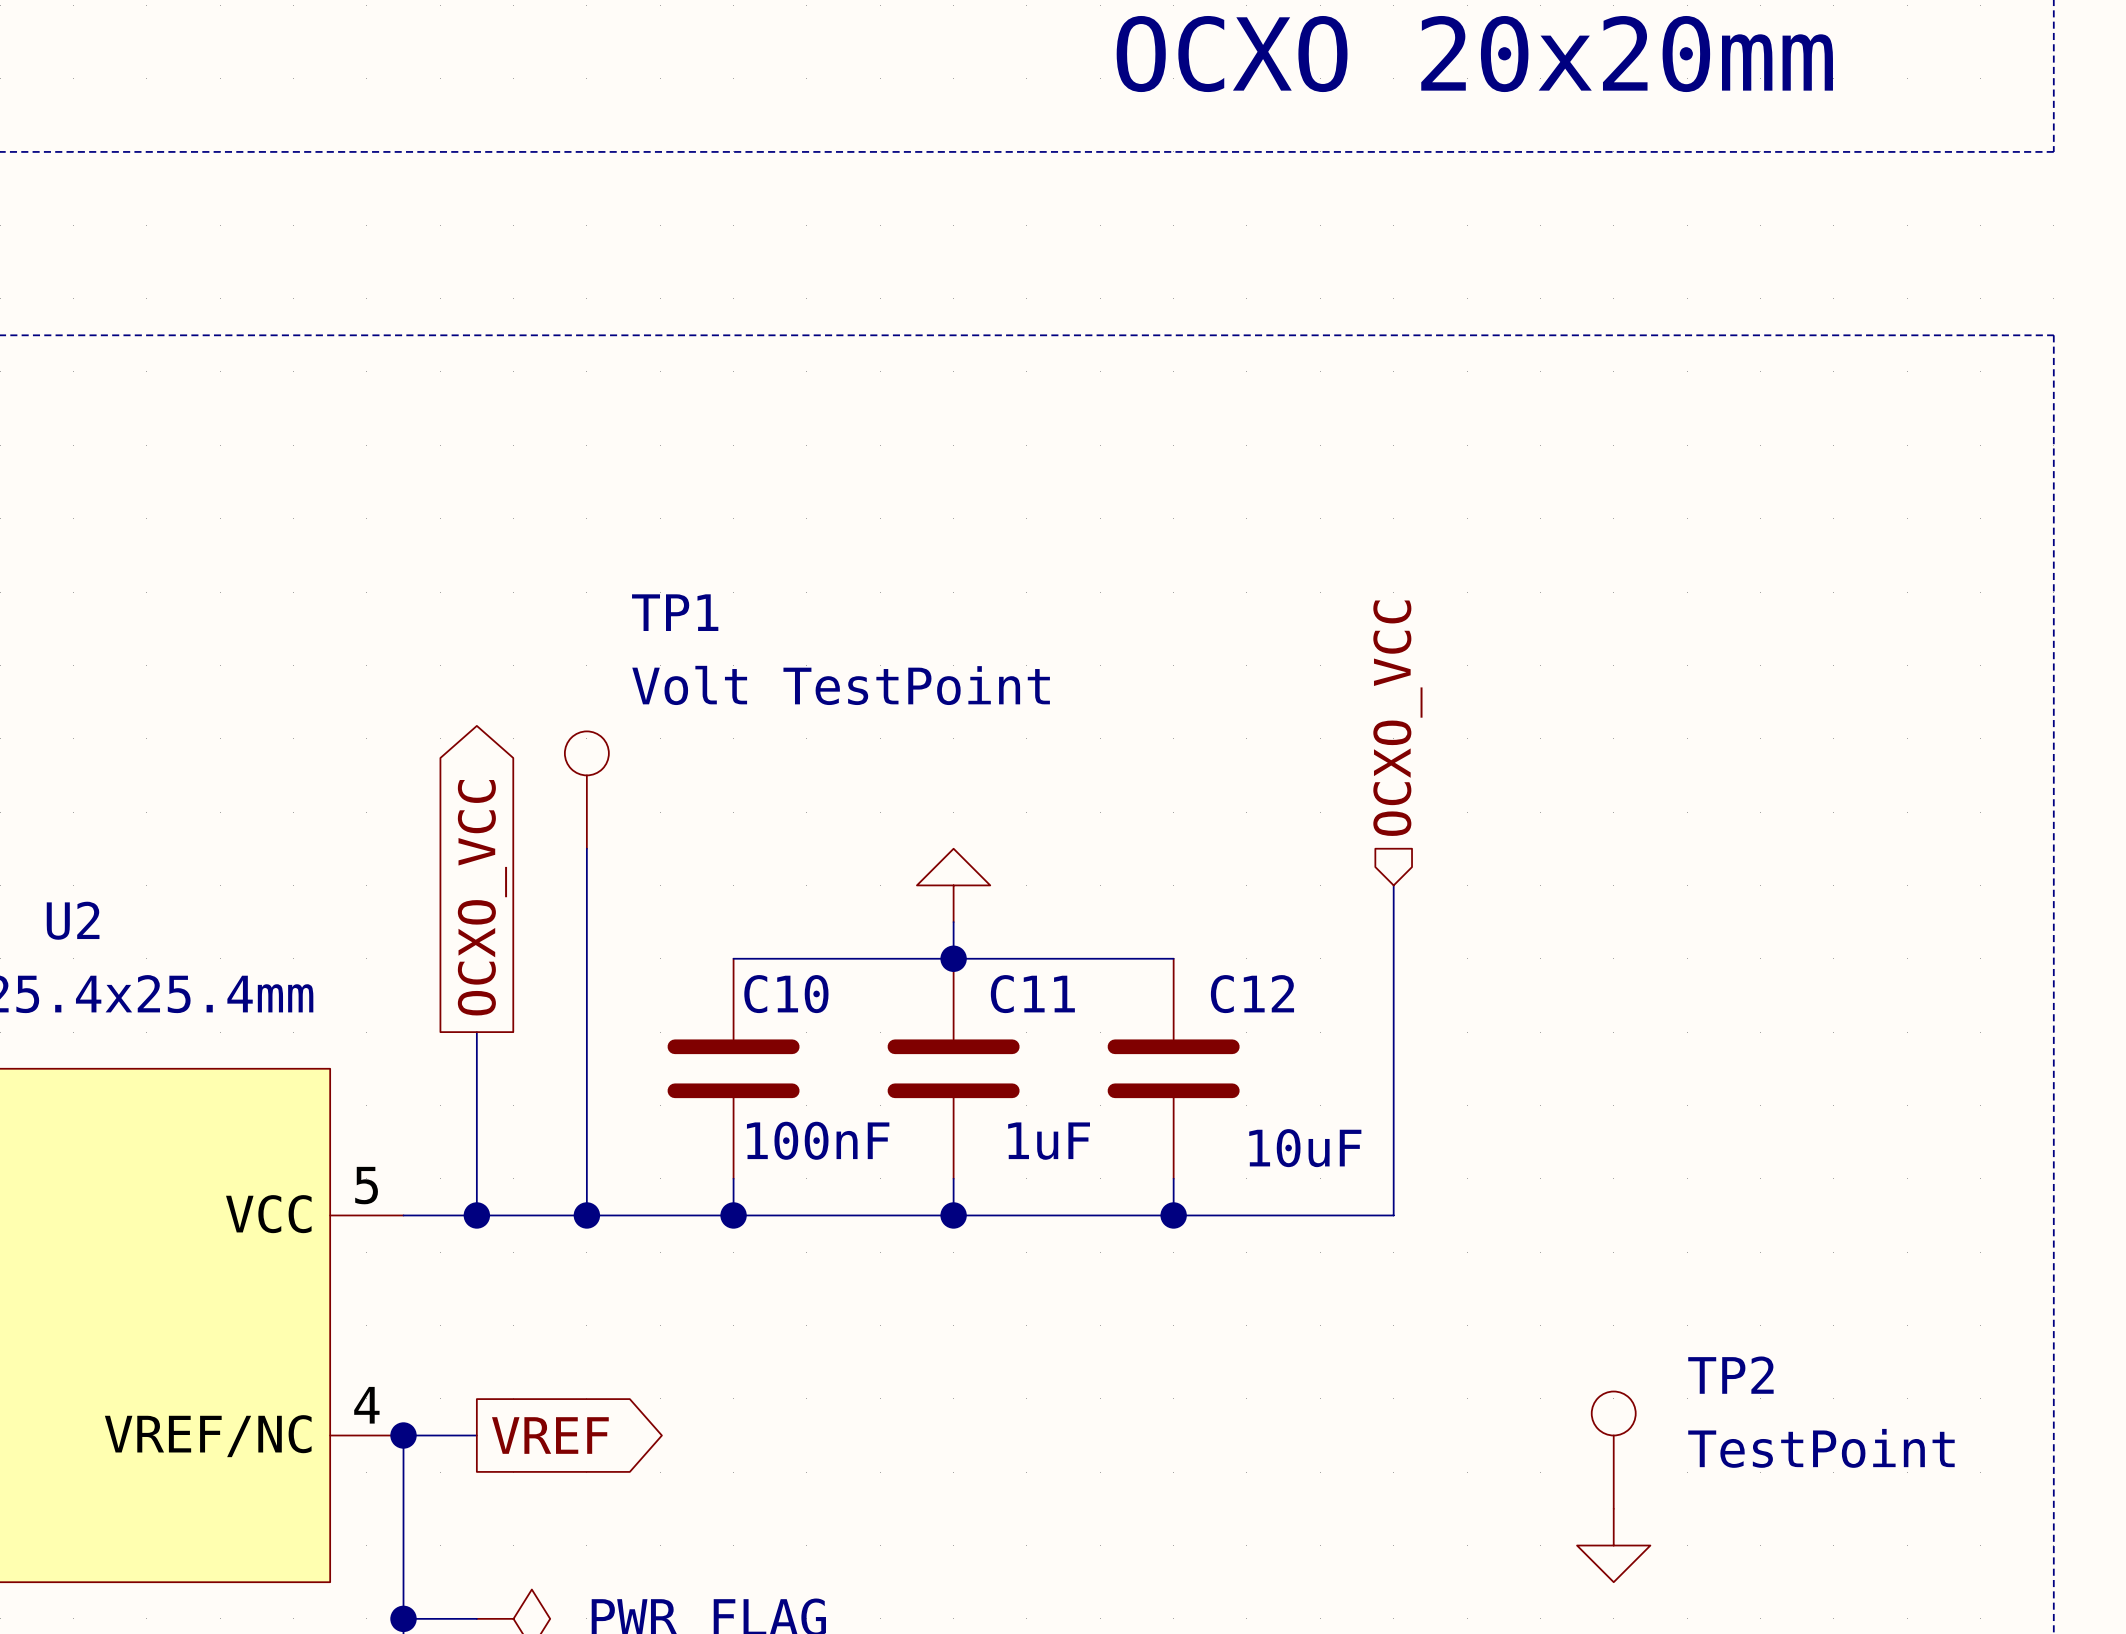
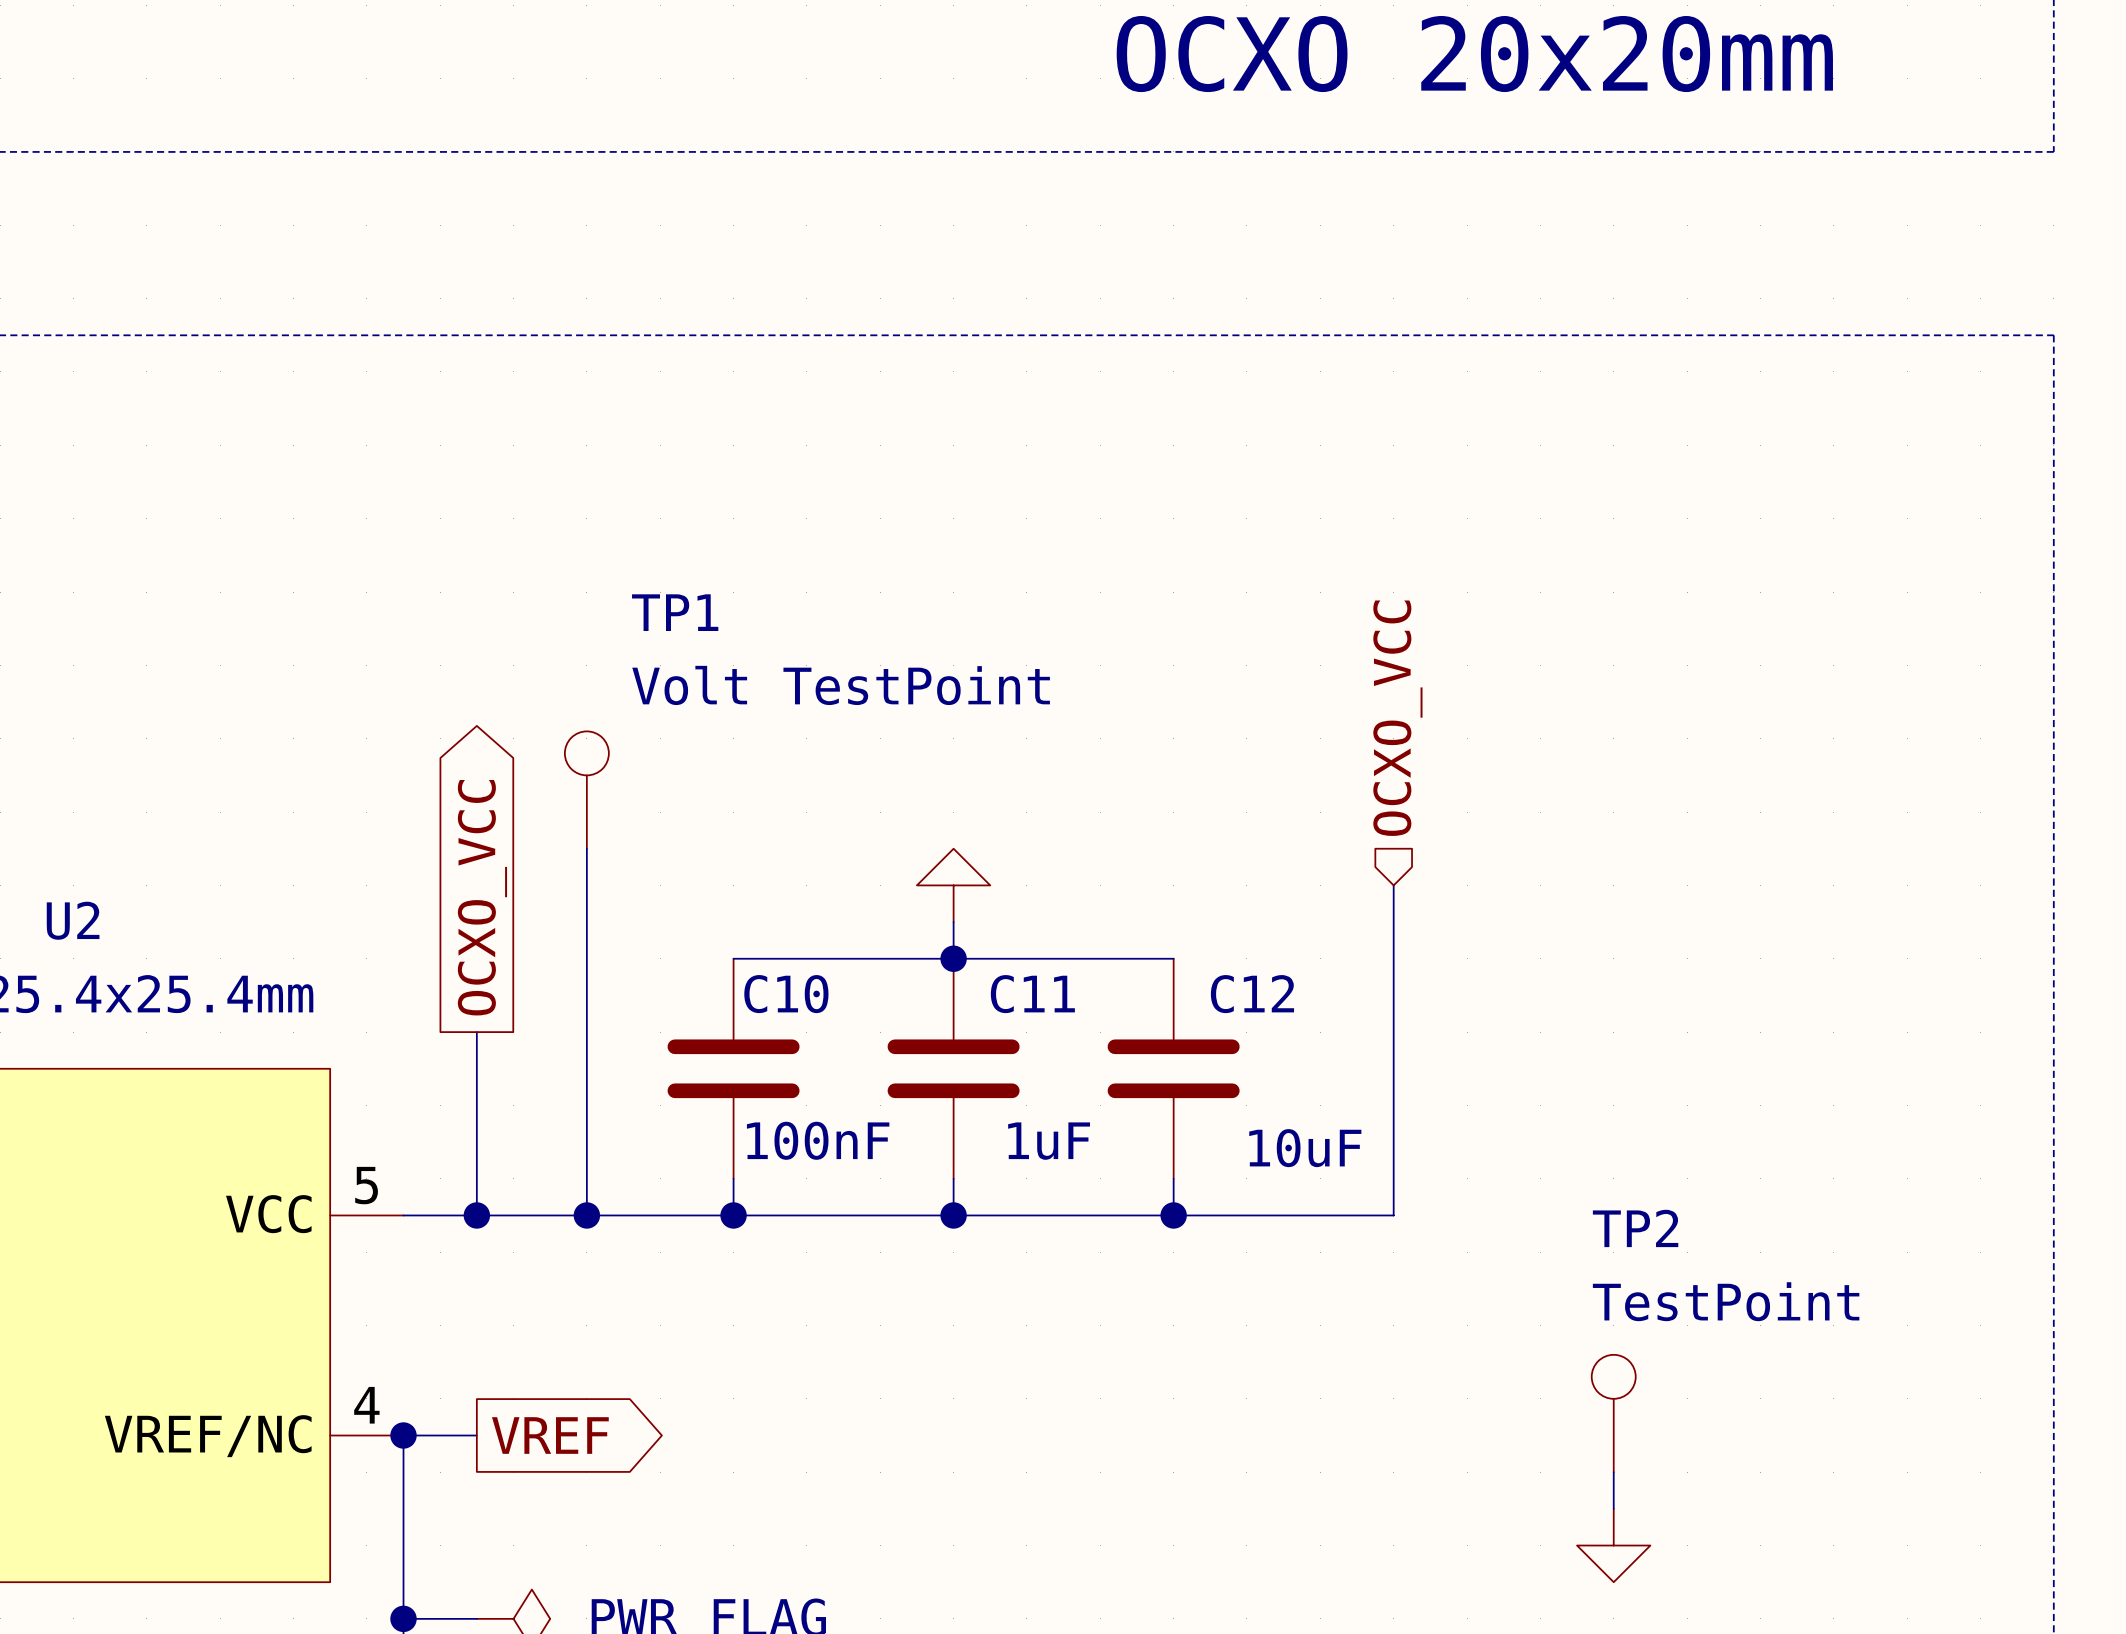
TP2 name position: TP2 (1730, 1375) -> TP2 (1635, 1228)
TP2 value position: TestPoint (1821, 1448) -> TestPoint (1726, 1301)
TP2 position: (1613, 1450) -> (1613, 1413)

